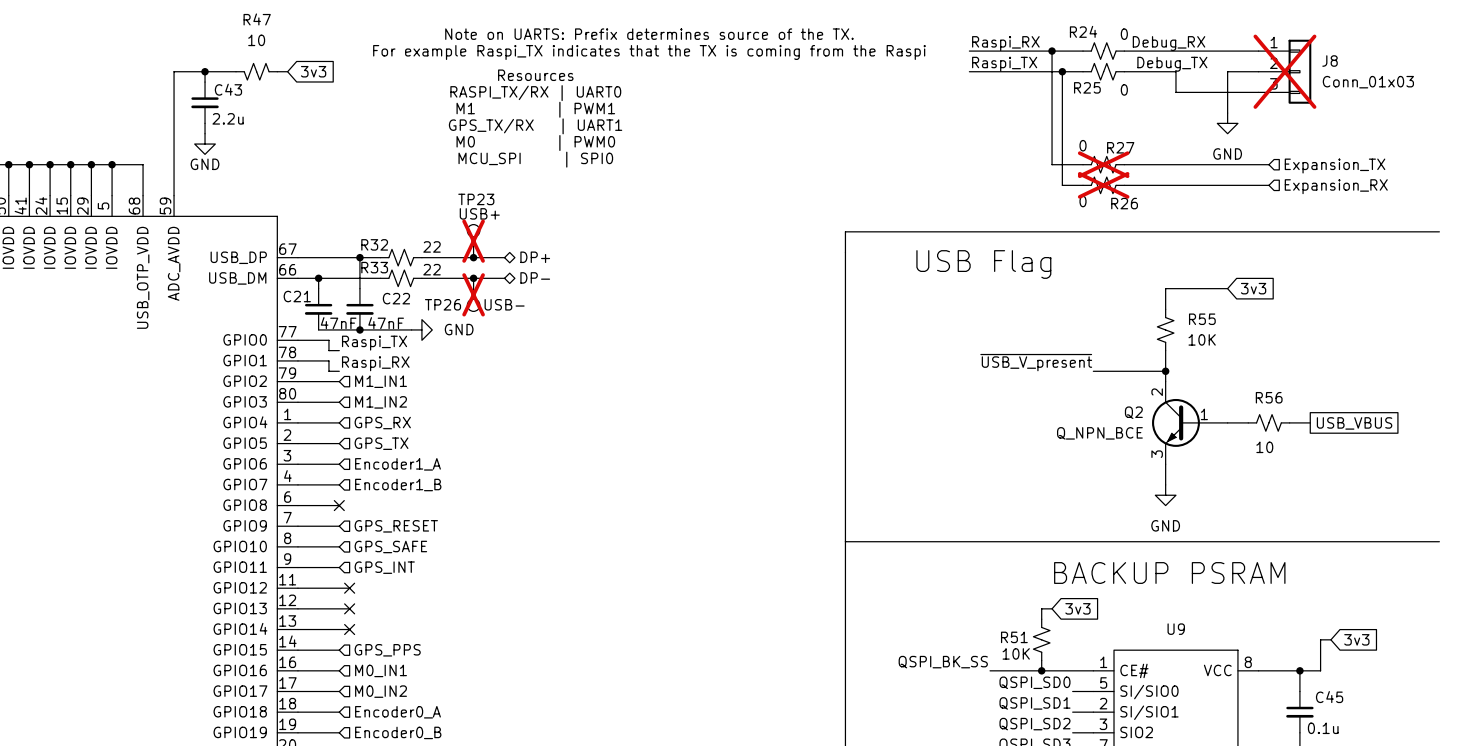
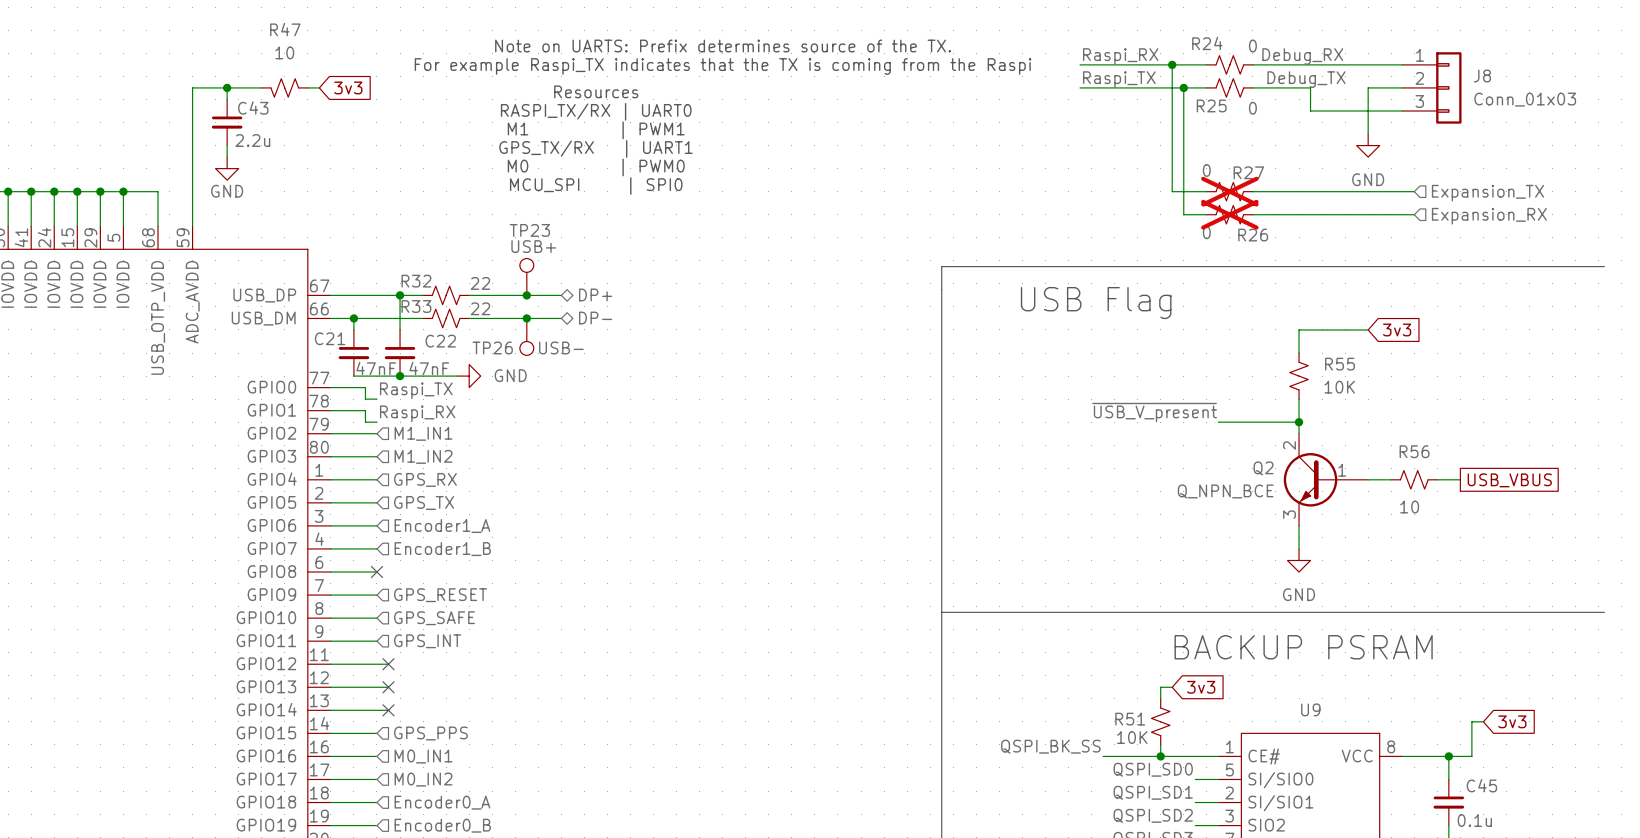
J8 do-not-place cross: (1284, 71) -> none
TP23 do-not-place cross: (473, 241) -> none
TP26 do-not-place cross: (473, 294) -> none

